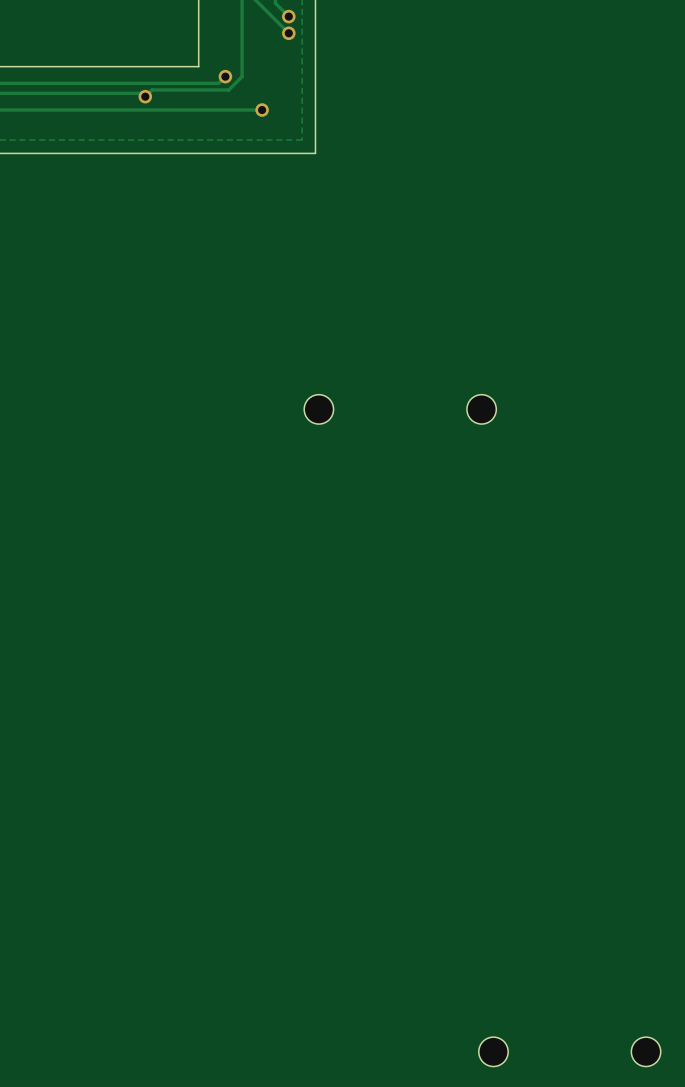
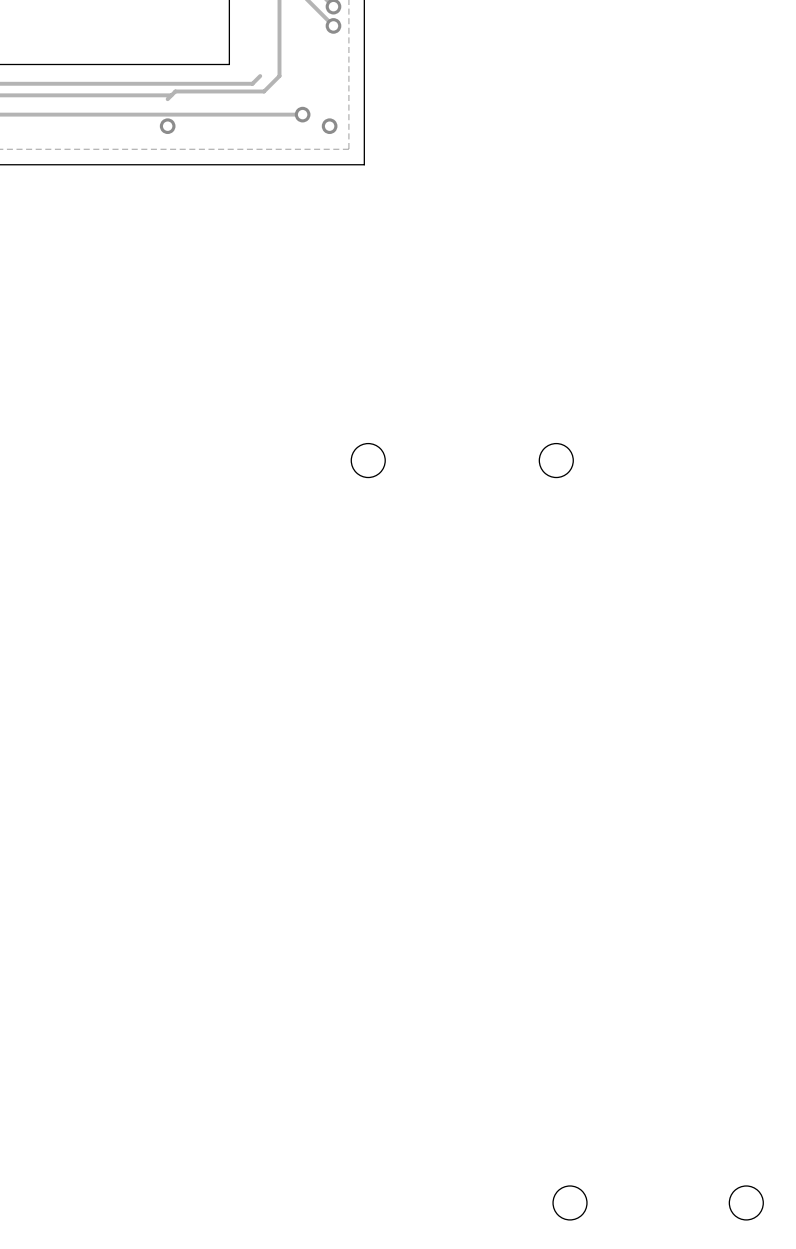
via: (225, 76) -> none
via position: (145, 96) -> (167, 126)
via: none -> (329, 126)

